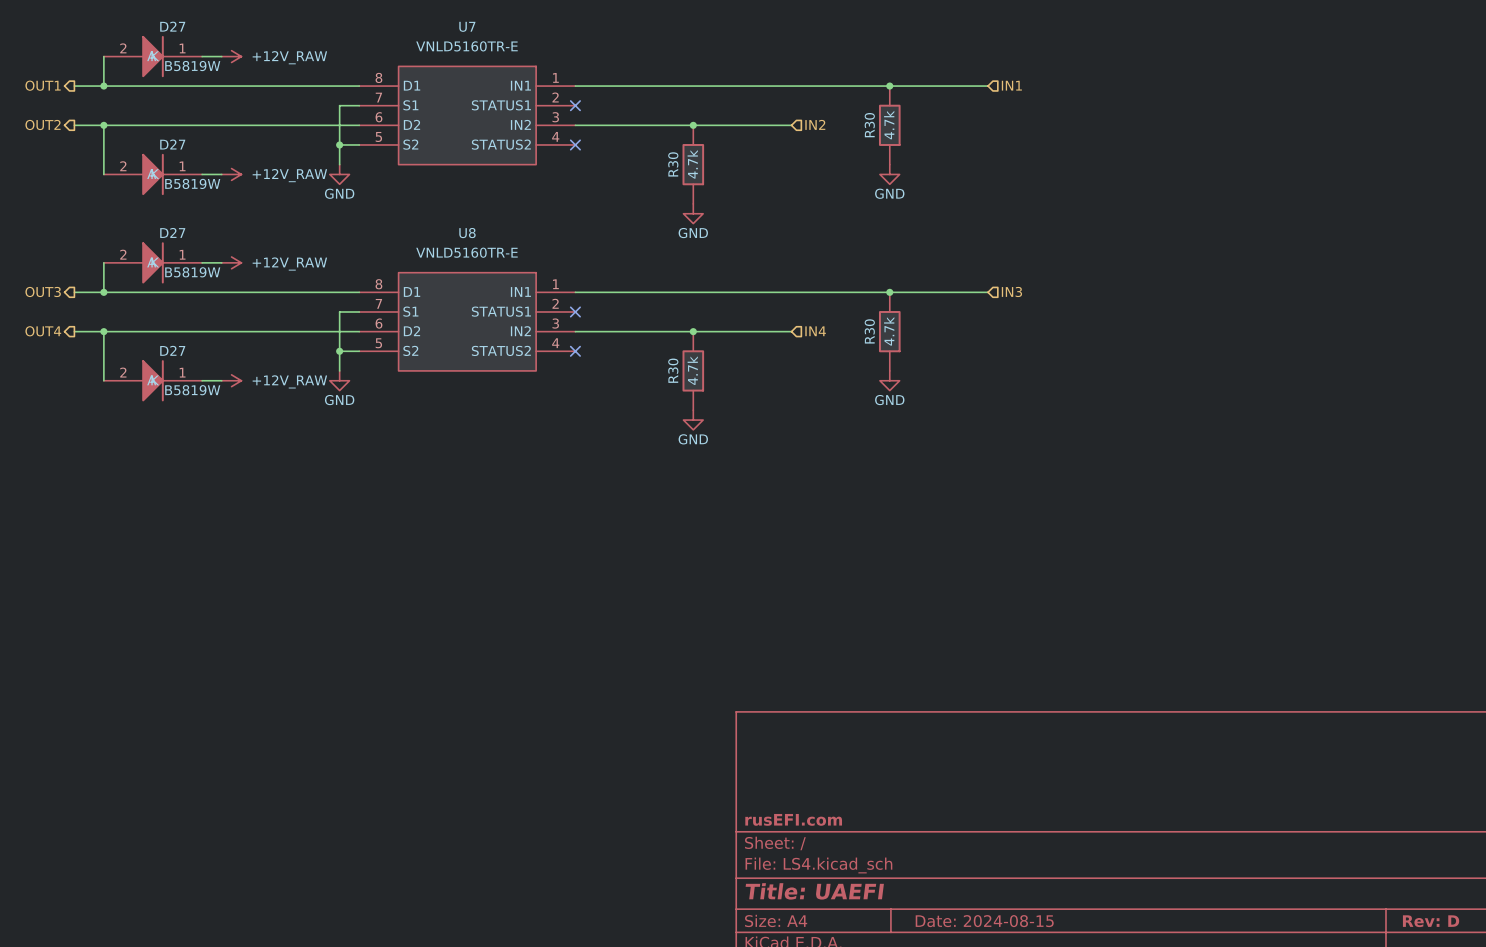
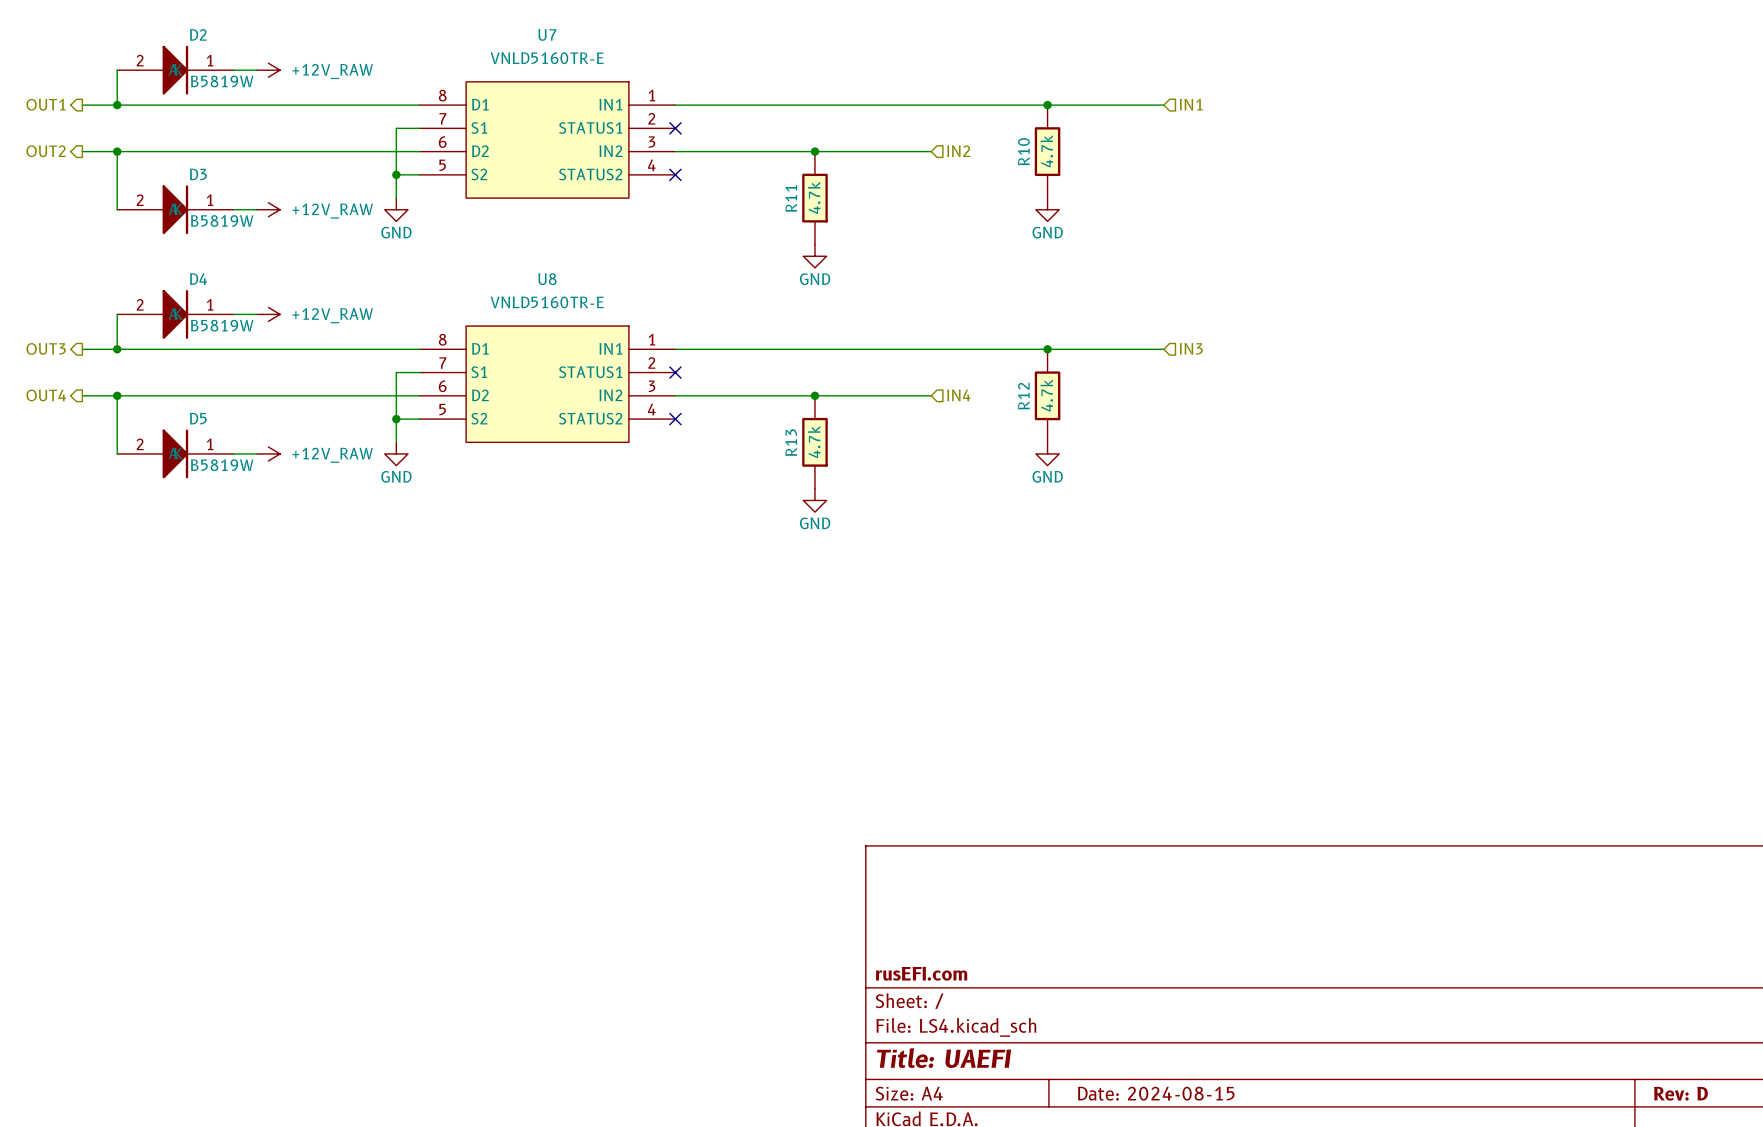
D27 name: D27 (172, 26) -> D2 (198, 34)
R30 name: R30 (869, 125) -> R10 (1023, 151)
D27 name: D27 (172, 144) -> D3 (198, 174)
R30 name: R30 (673, 164) -> R11 (791, 198)
D27 name: D27 (172, 232) -> D4 (198, 279)
R30 name: R30 (869, 331) -> R12 (1023, 396)
D27 name: D27 (172, 350) -> D5 (198, 418)
R30 name: R30 (673, 370) -> R13 (791, 442)

